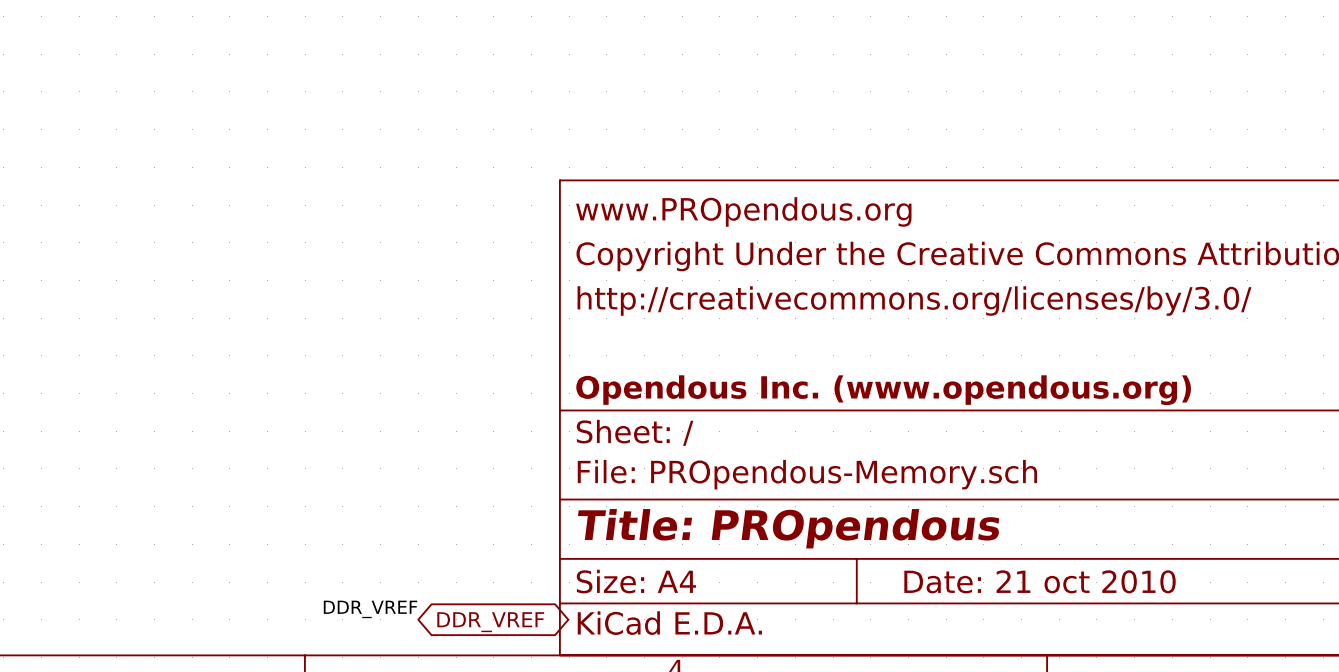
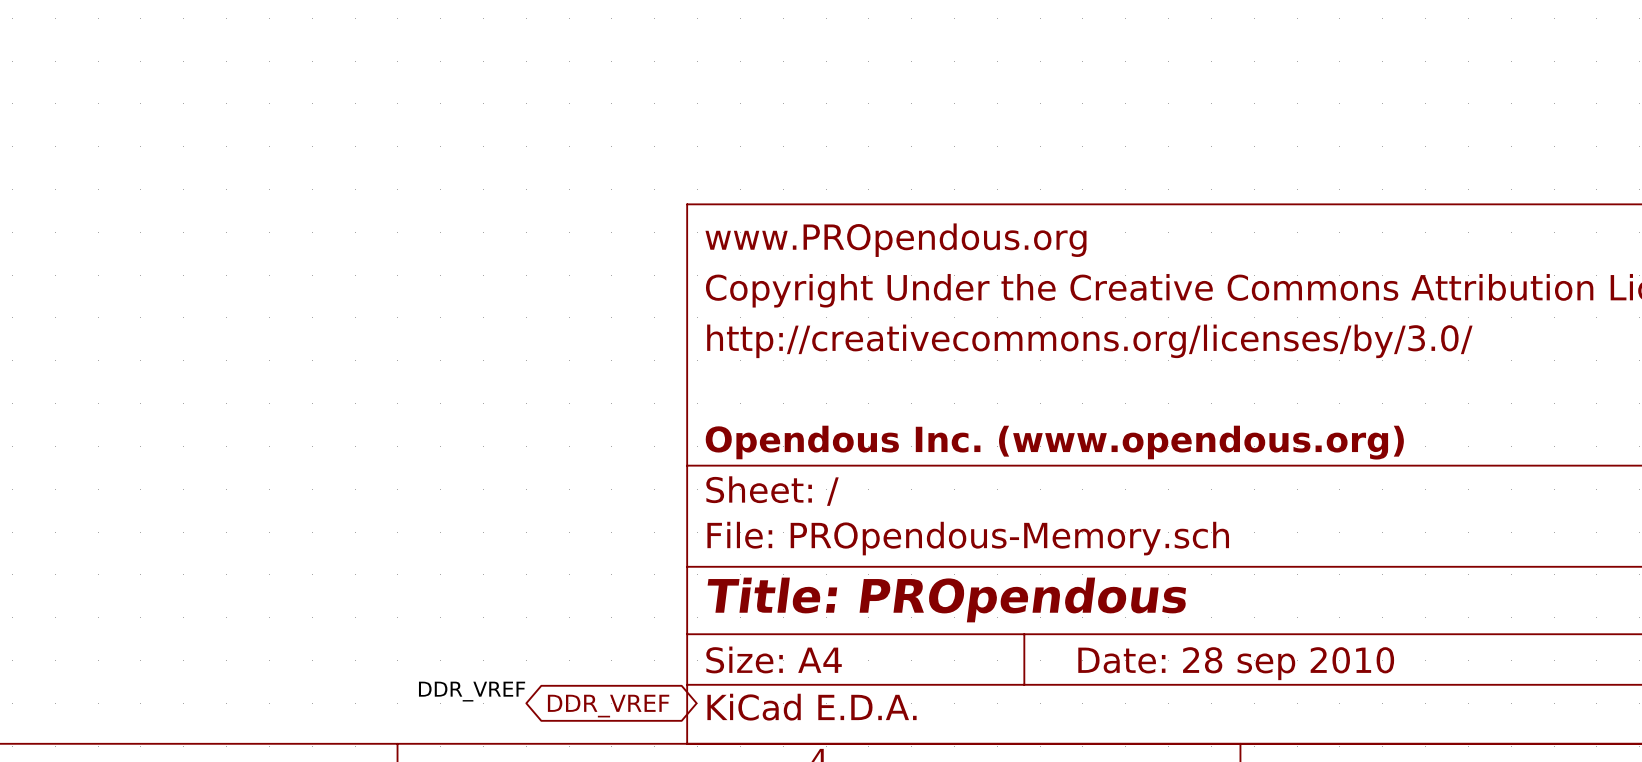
title block: Date: 21 oct 2010 (1040, 581) -> Date: 28 sep 2010 (1236, 663)

